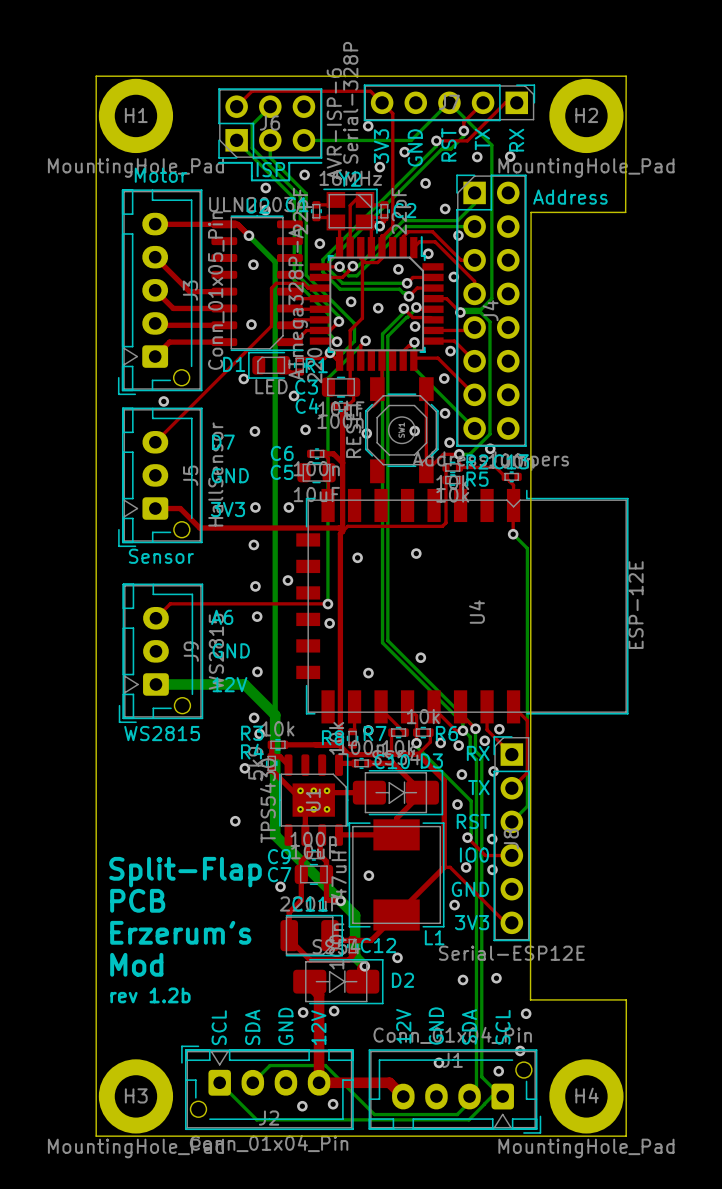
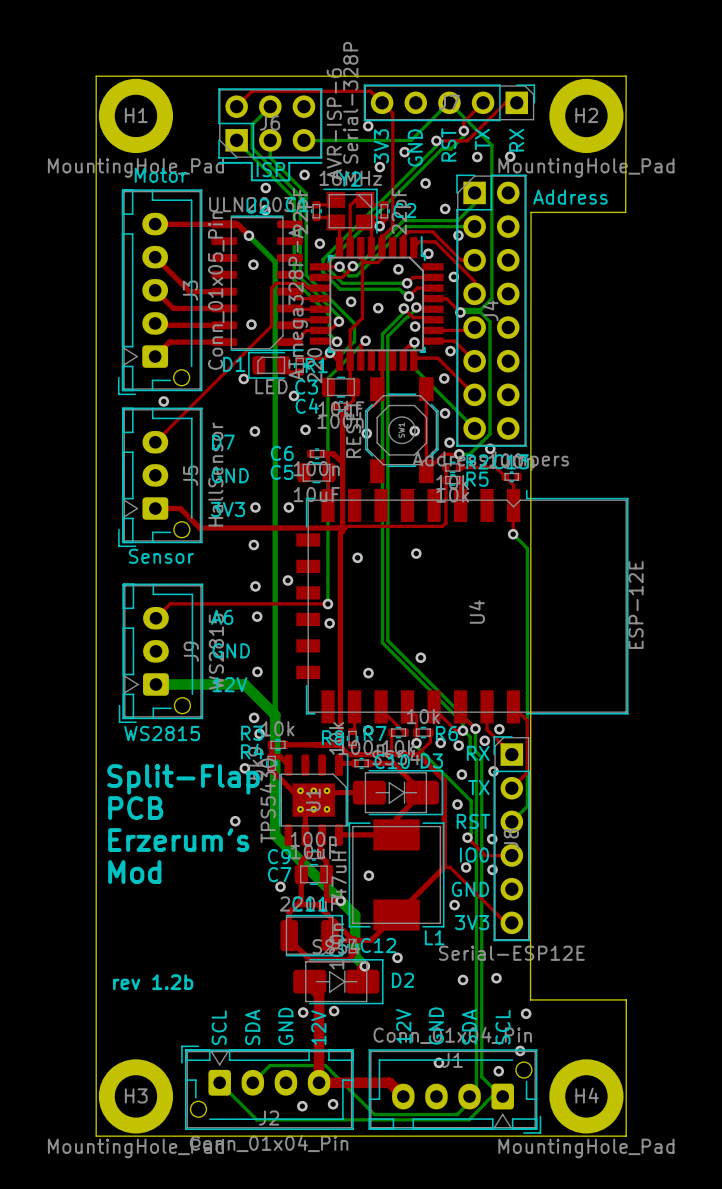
text position: Split-Flap (185, 872) -> Split-Flap (183, 779)
text position: PCB (137, 900) -> PCB (135, 808)
top track: none -> (294, 904) (317, 904) (352, 939)
text position: Erzerum's (180, 932) -> Erzerum's (178, 840)
text position: Mod (136, 964) -> Mod (134, 872)
text position: rev 1.2b (150, 995) -> rev 1.2b (153, 982)

